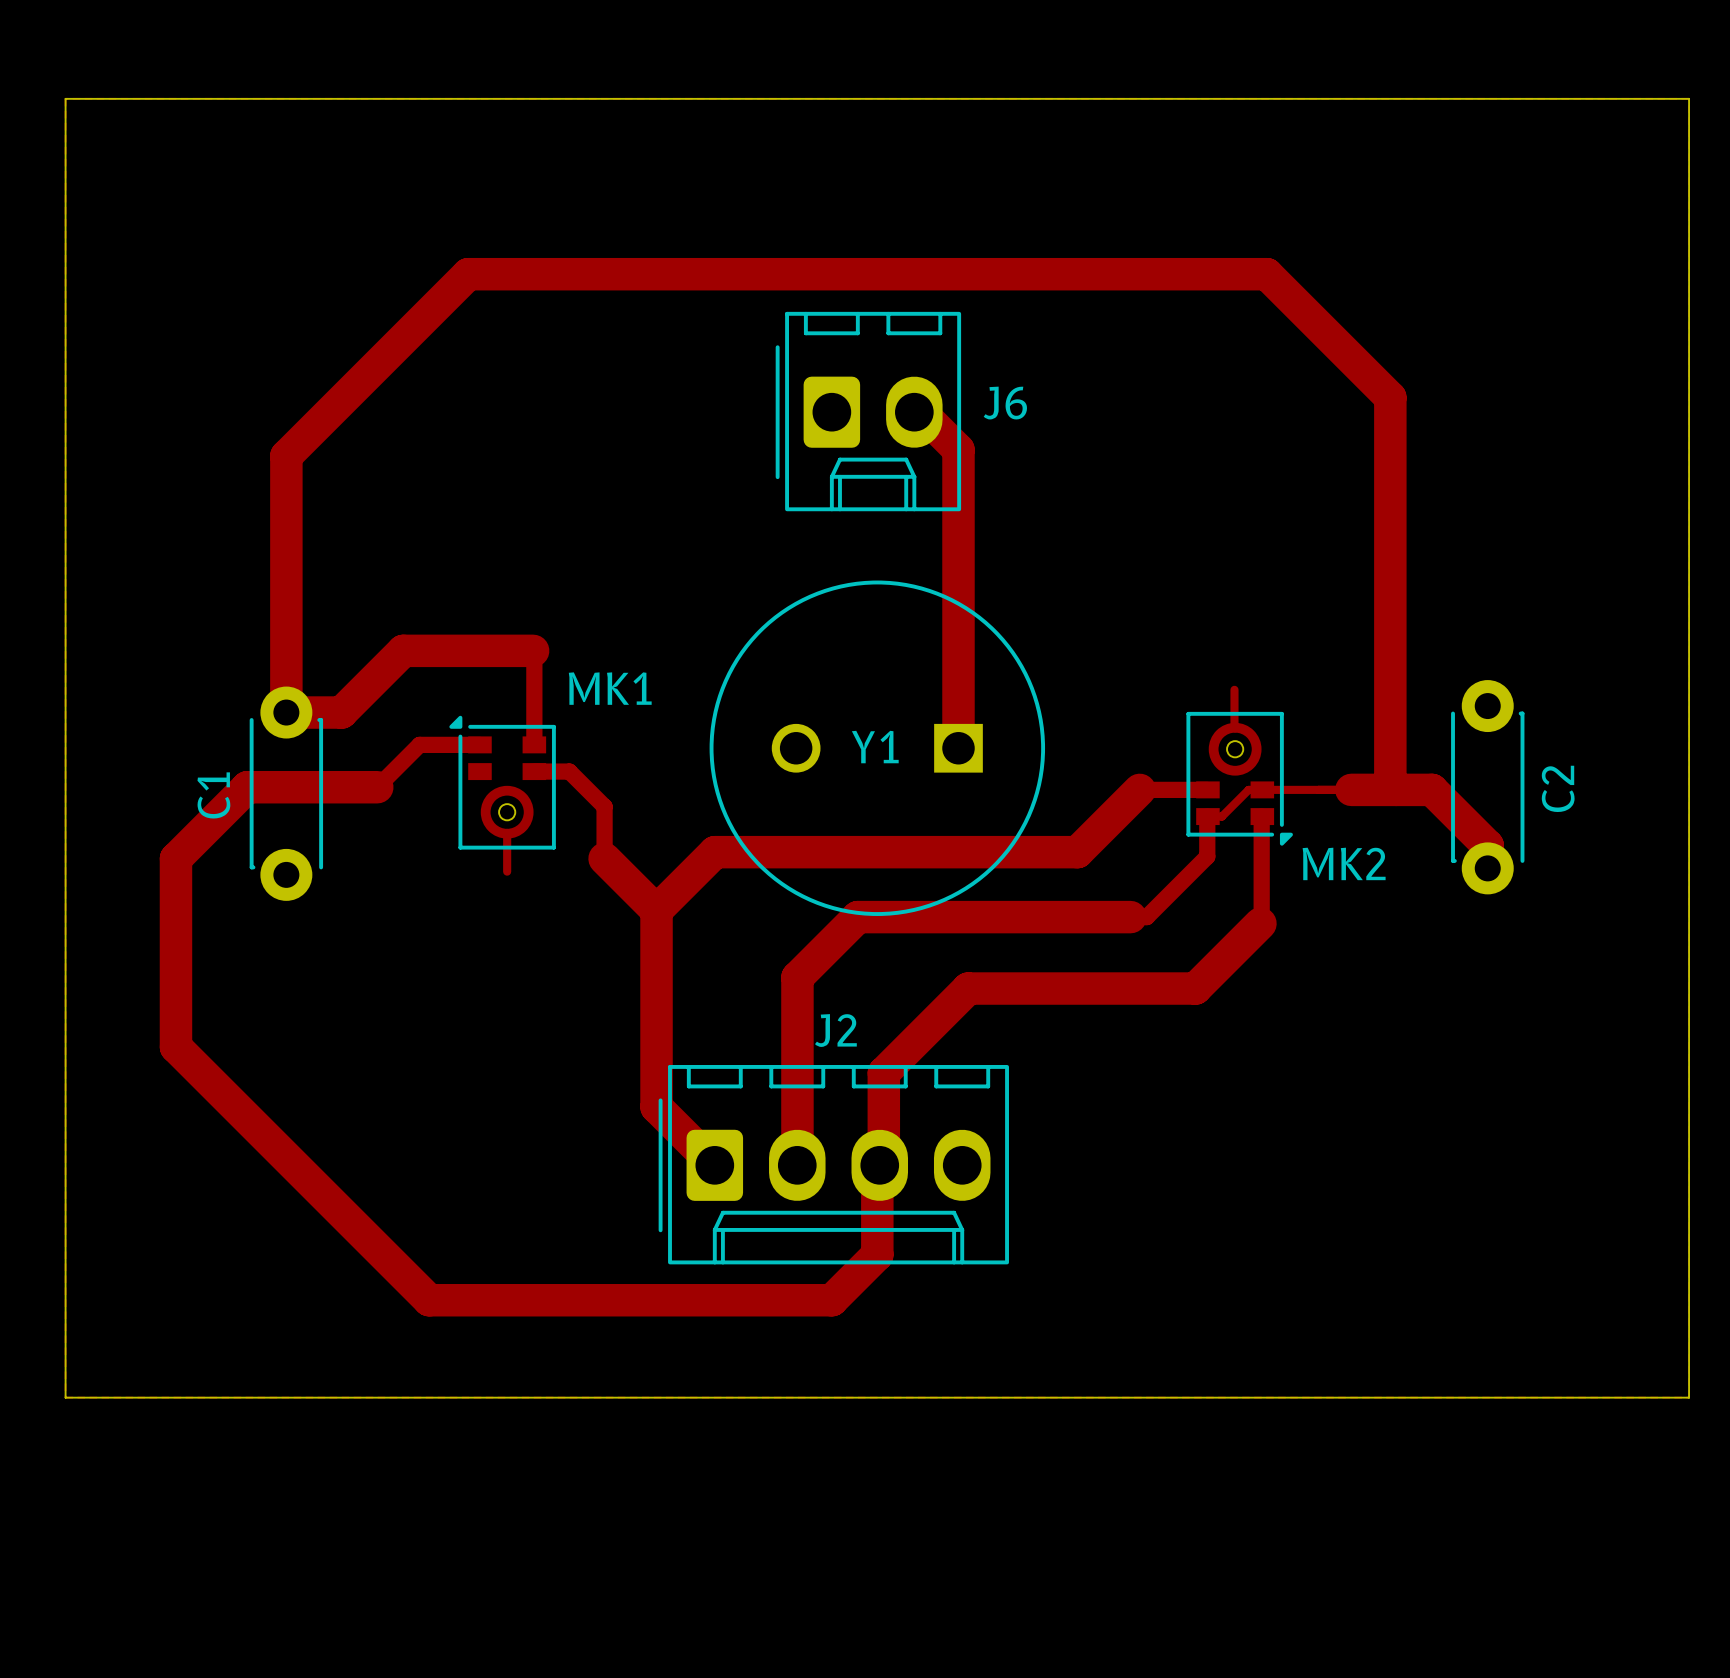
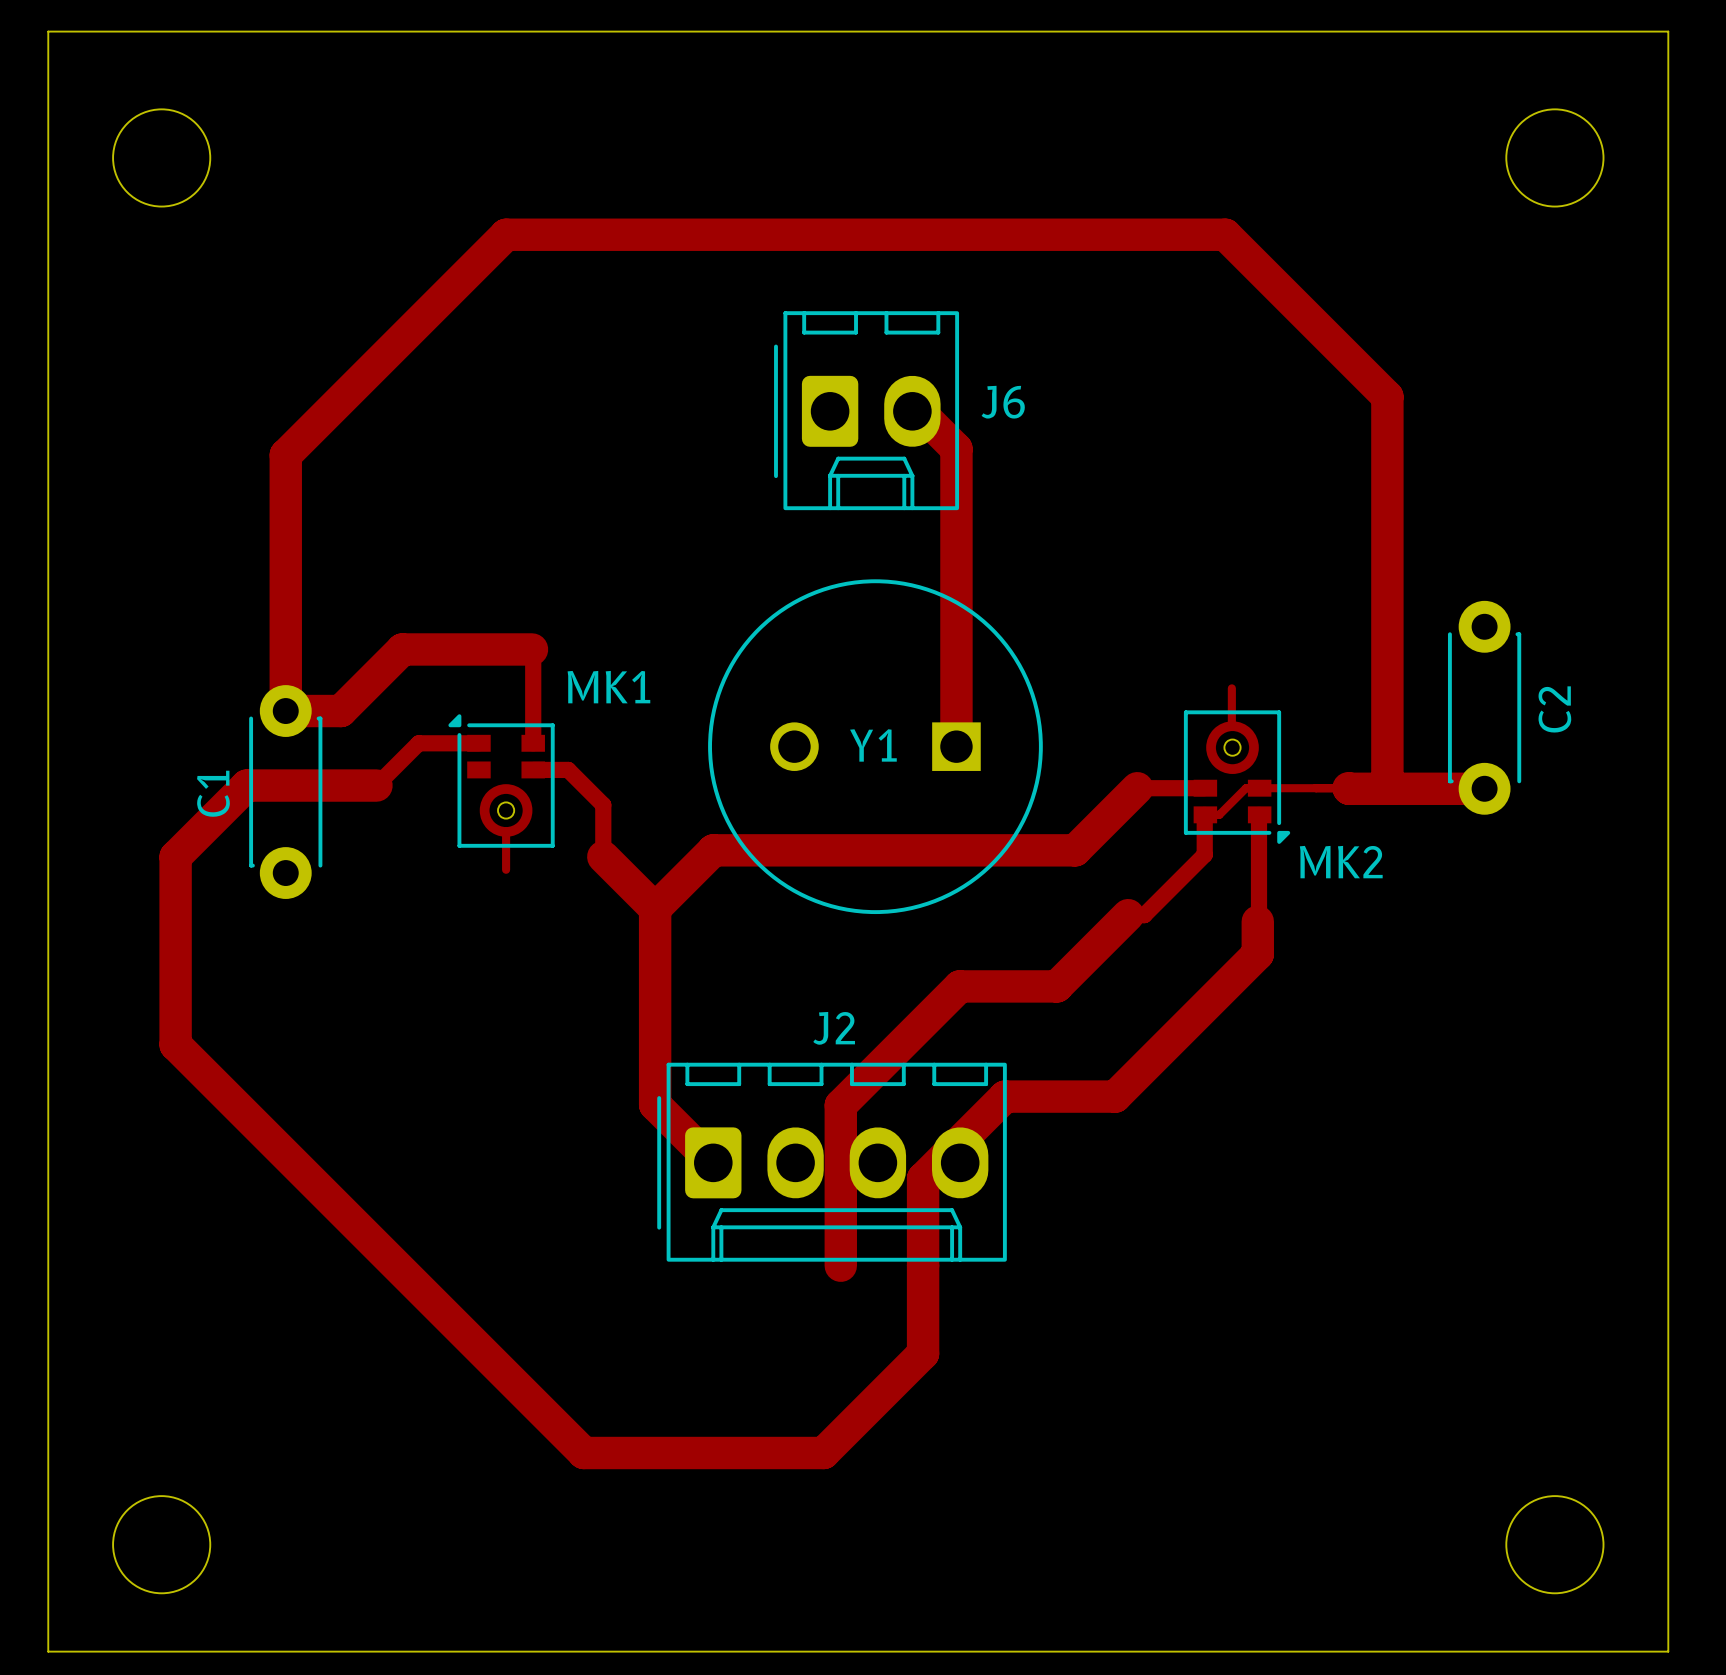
board edge: (65, 98) (1689, 98) (1689, 1397) (65, 1397) (65, 98) -> (48, 31) (48, 1651) (1668, 1651) (1668, 31) (48, 31)
round board edge: none -> [112, 108, 212, 208]
round board edge: none -> [1505, 108, 1605, 208]
track: (468, 274) (1266, 274) -> (467, 273) (506, 234) (1225, 234) (1264, 273)
C2 position: (1487, 787) -> (1484, 707)
track: (1351, 789) (1431, 789) (1487, 845) (1487, 868) -> (1348, 788) (1484, 788)
track: (1130, 917) (857, 917) (797, 977) (797, 1165) -> none
track: (1260, 923) (1195, 988) (1059, 988) -> (1128, 915) (1056, 986)
track: (968, 988) (883, 1072) (883, 1161) (877, 1168) (877, 1254) (831, 1300) (429, 1300) -> (1257, 921) (1257, 954) (1115, 1096) (1005, 1096) (923, 1178) (923, 1353) (823, 1453) (583, 1453) (428, 1297)
track: none -> (966, 986) (959, 986) (840, 1105) (840, 1265)
round board edge: none -> [112, 1495, 212, 1595]
round board edge: none -> [1505, 1495, 1605, 1595]

